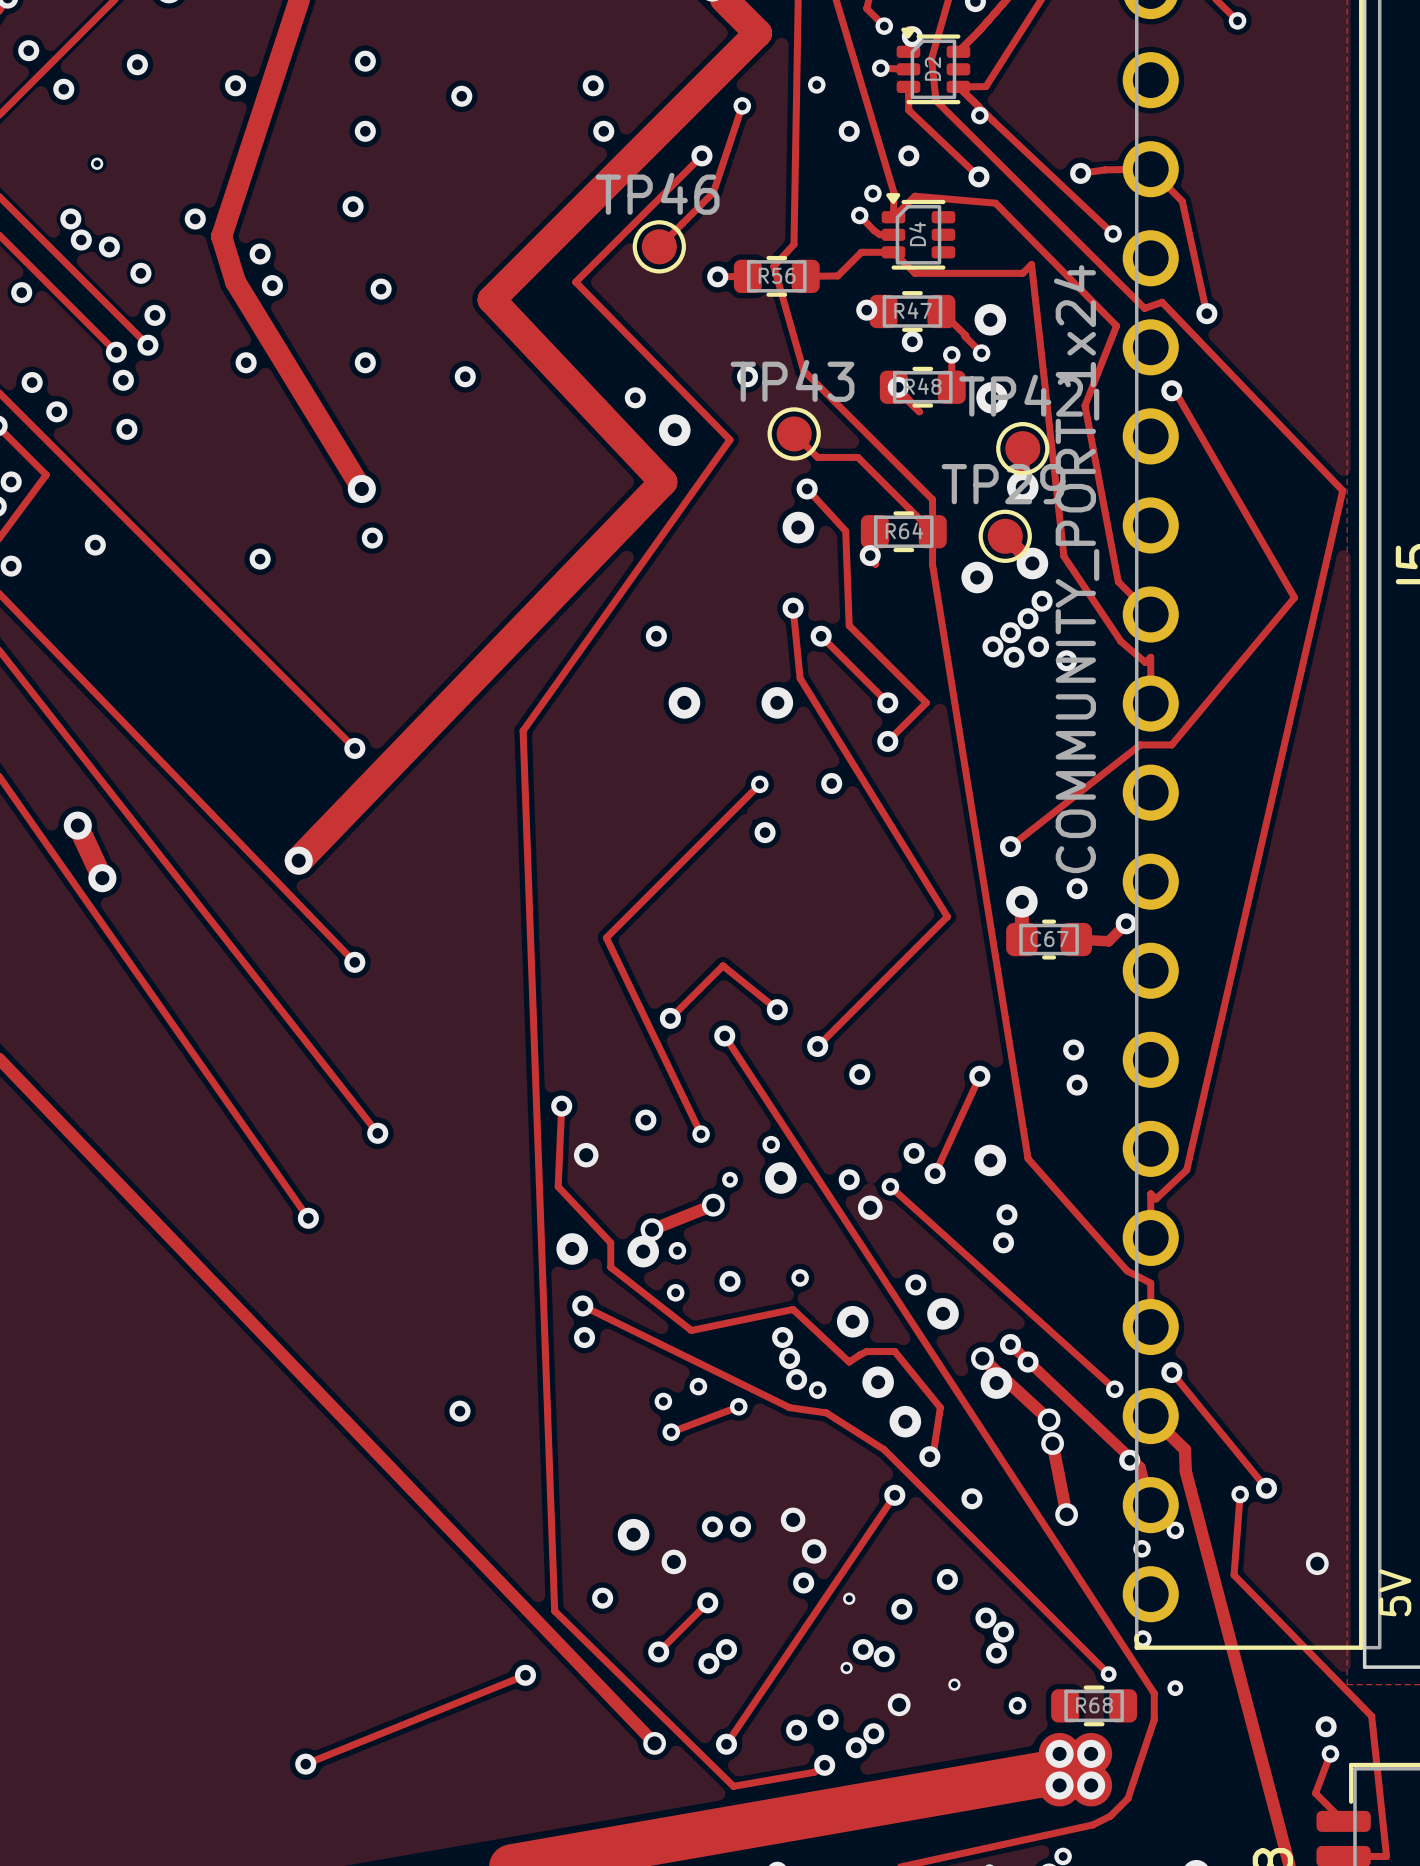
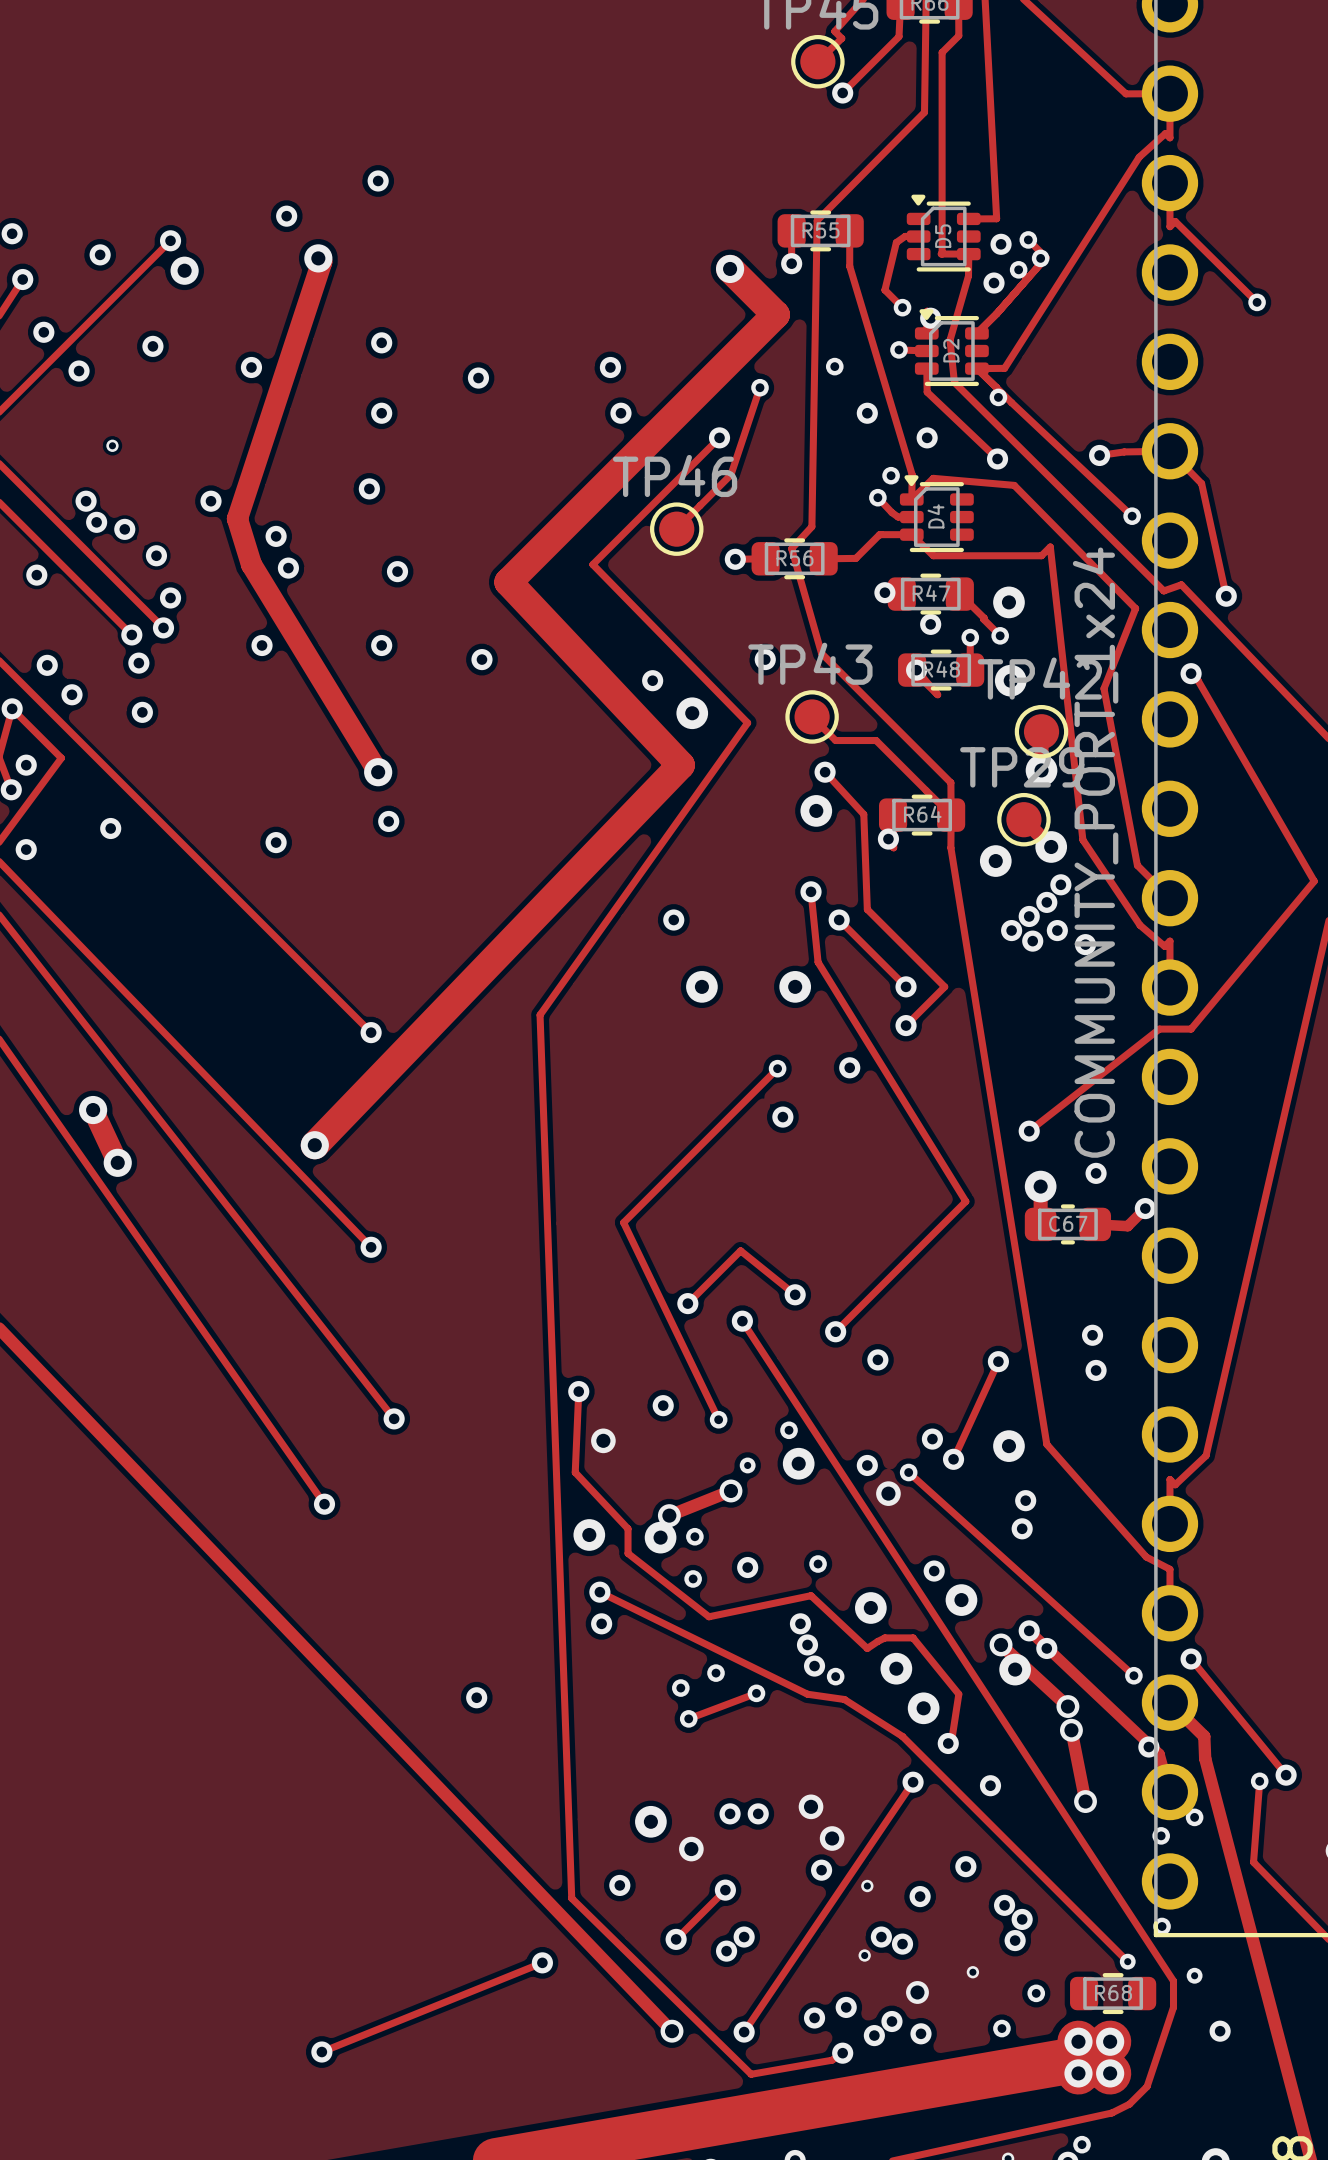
via: none -> (1001, 2028)
via: none -> (1220, 2031)
via: none -> (920, 2033)

